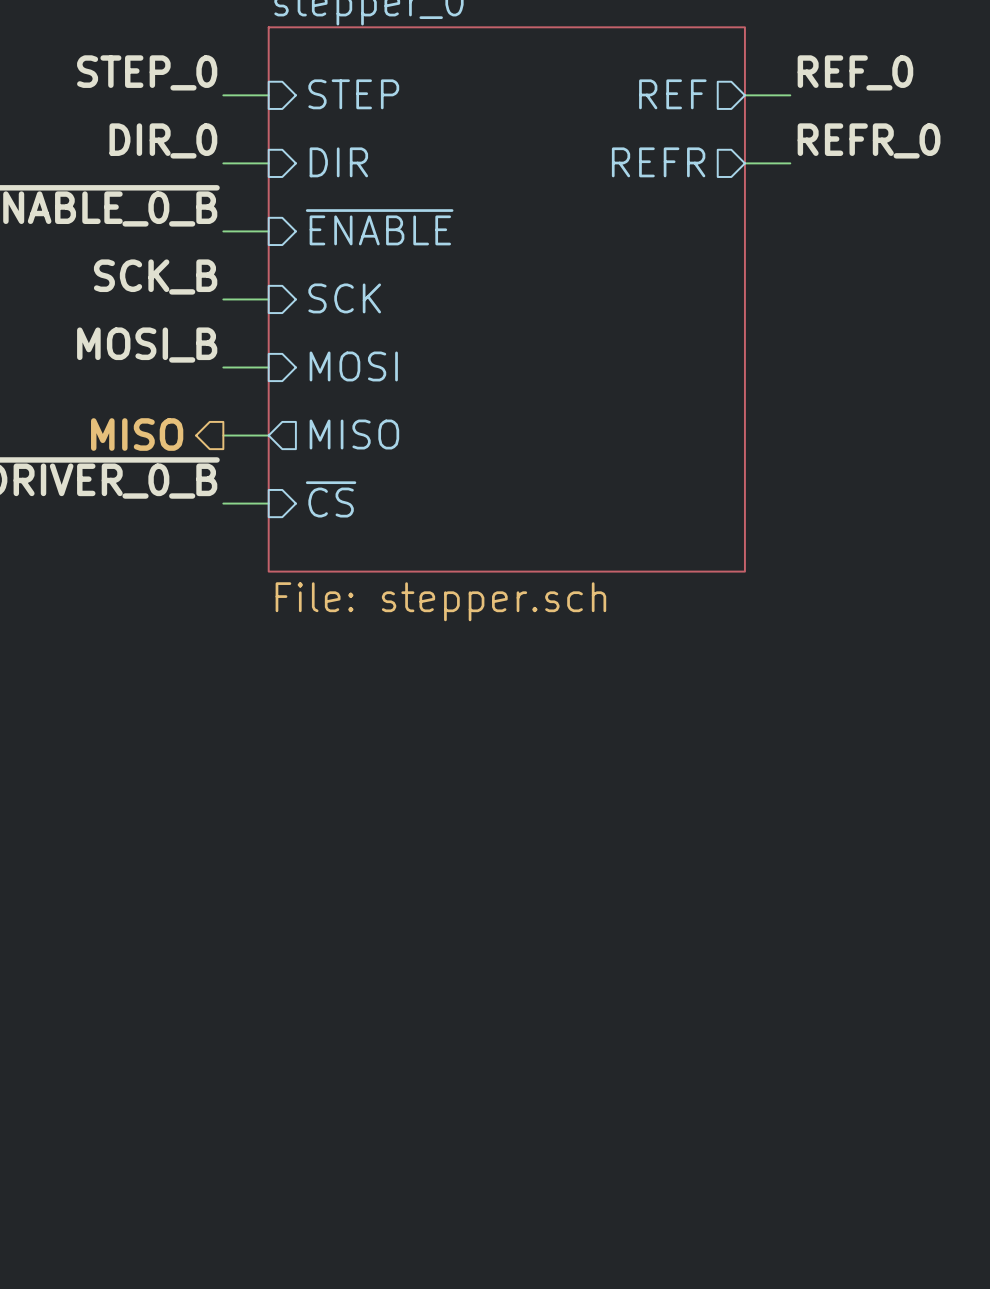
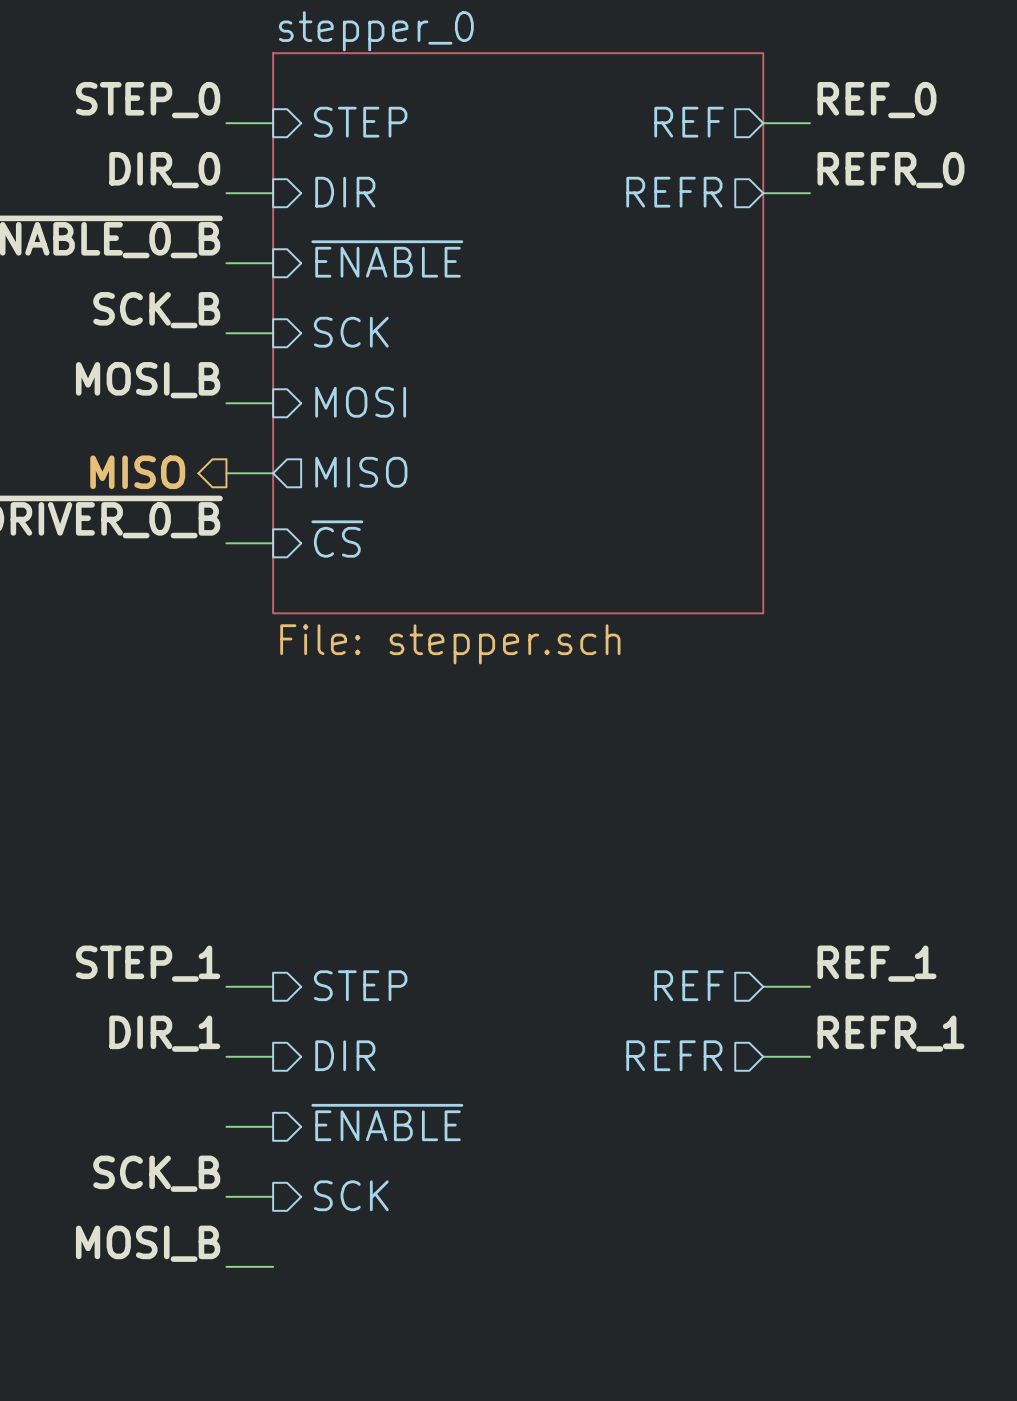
label: none -> STEP_1 (148, 963)
label: none -> REF_1 (876, 963)
sheet pin: none -> STEP (360, 985)
sheet pin: none -> REF (689, 985)
wire: none -> (226, 986) (273, 986)
wire: none -> (763, 986) (809, 986)
label: none -> DIR_1 (164, 1033)
label: none -> REFR_1 (890, 1033)
sheet pin: none -> DIR (345, 1055)
sheet pin: none -> REFR (674, 1055)
wire: none -> (226, 1056) (273, 1056)
wire: none -> (763, 1056) (809, 1056)
sheet pin: none -> ~{ENABLE} (387, 1122)
wire: none -> (226, 1126) (273, 1126)
label: none -> SCK_B (156, 1173)
sheet pin: none -> SCK (351, 1195)
wire: none -> (226, 1196) (273, 1196)
label: none -> MOSI_B (148, 1243)
wire: none -> (226, 1266) (273, 1266)

